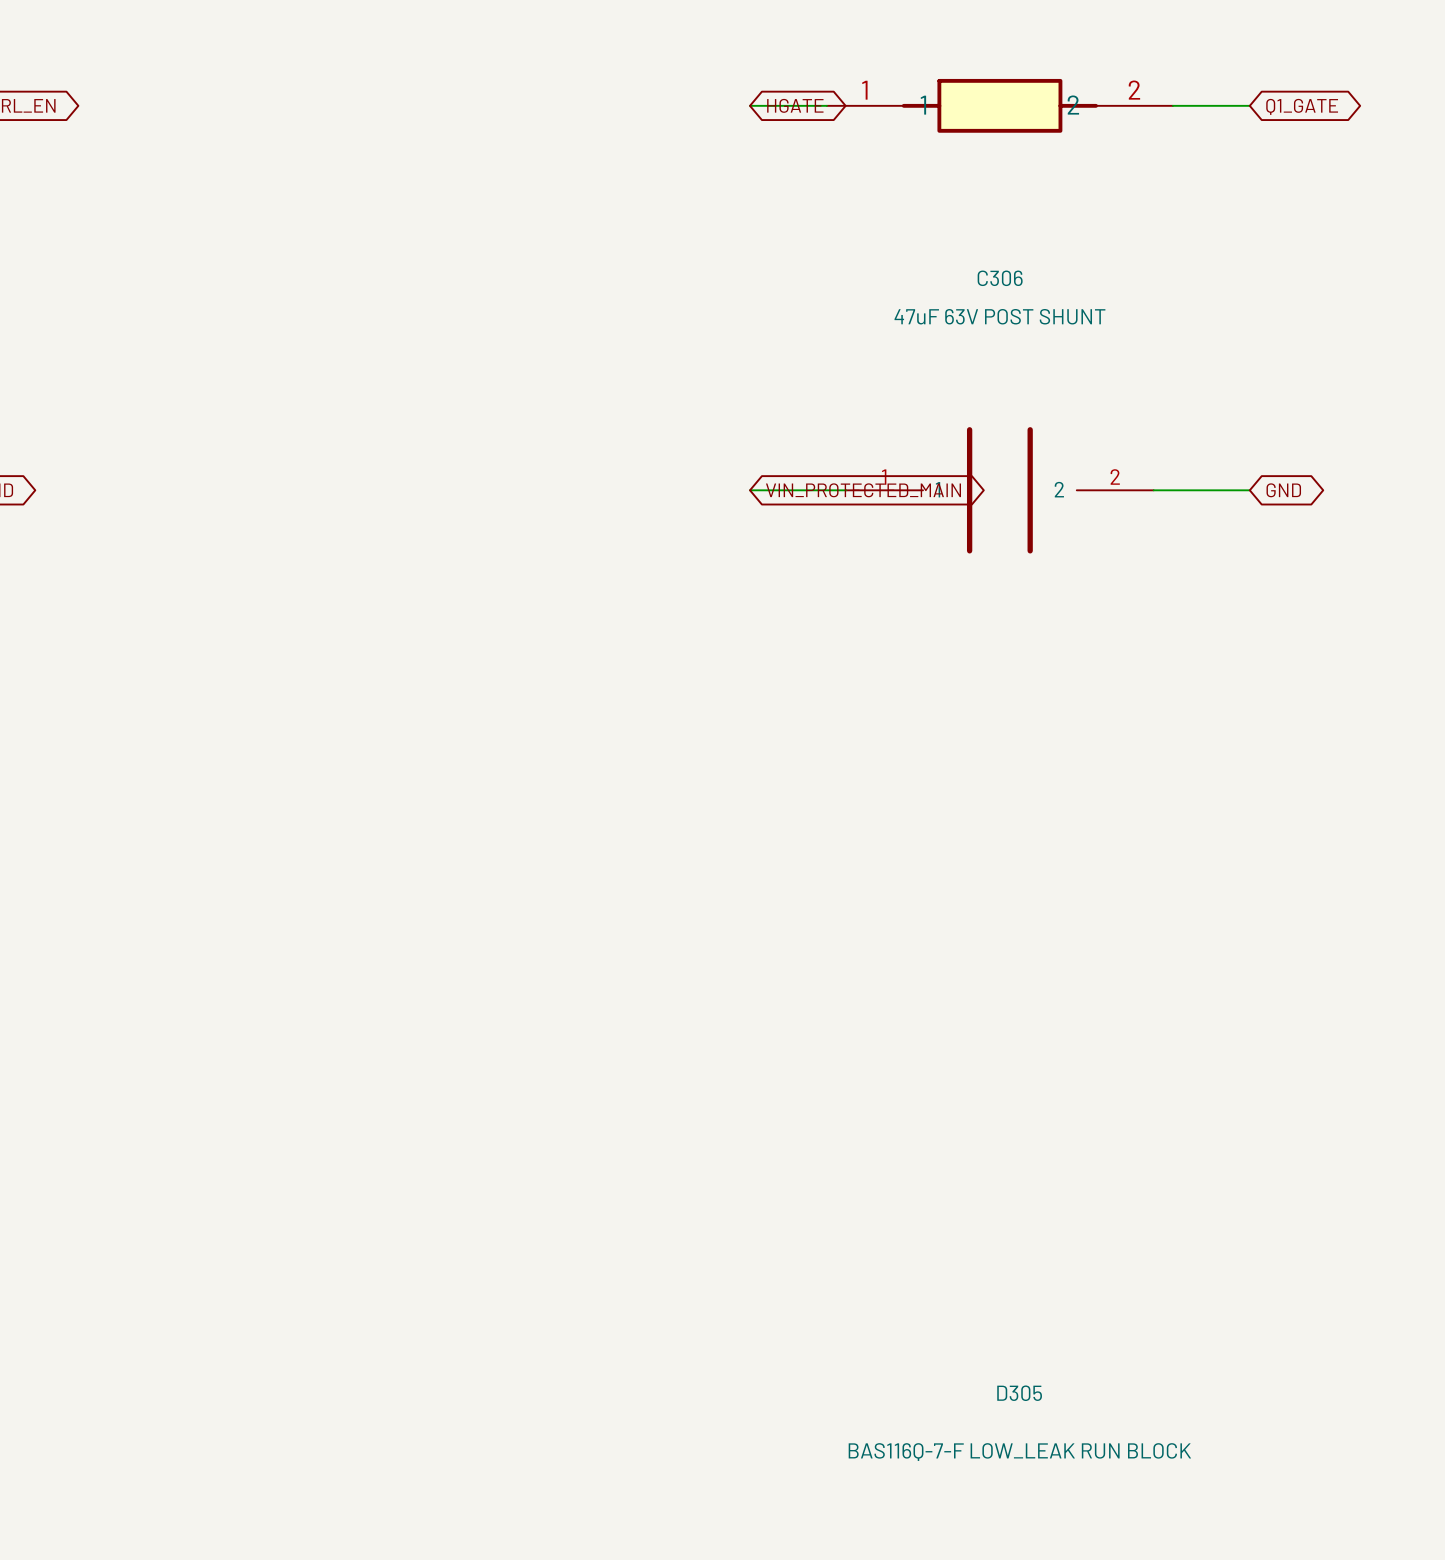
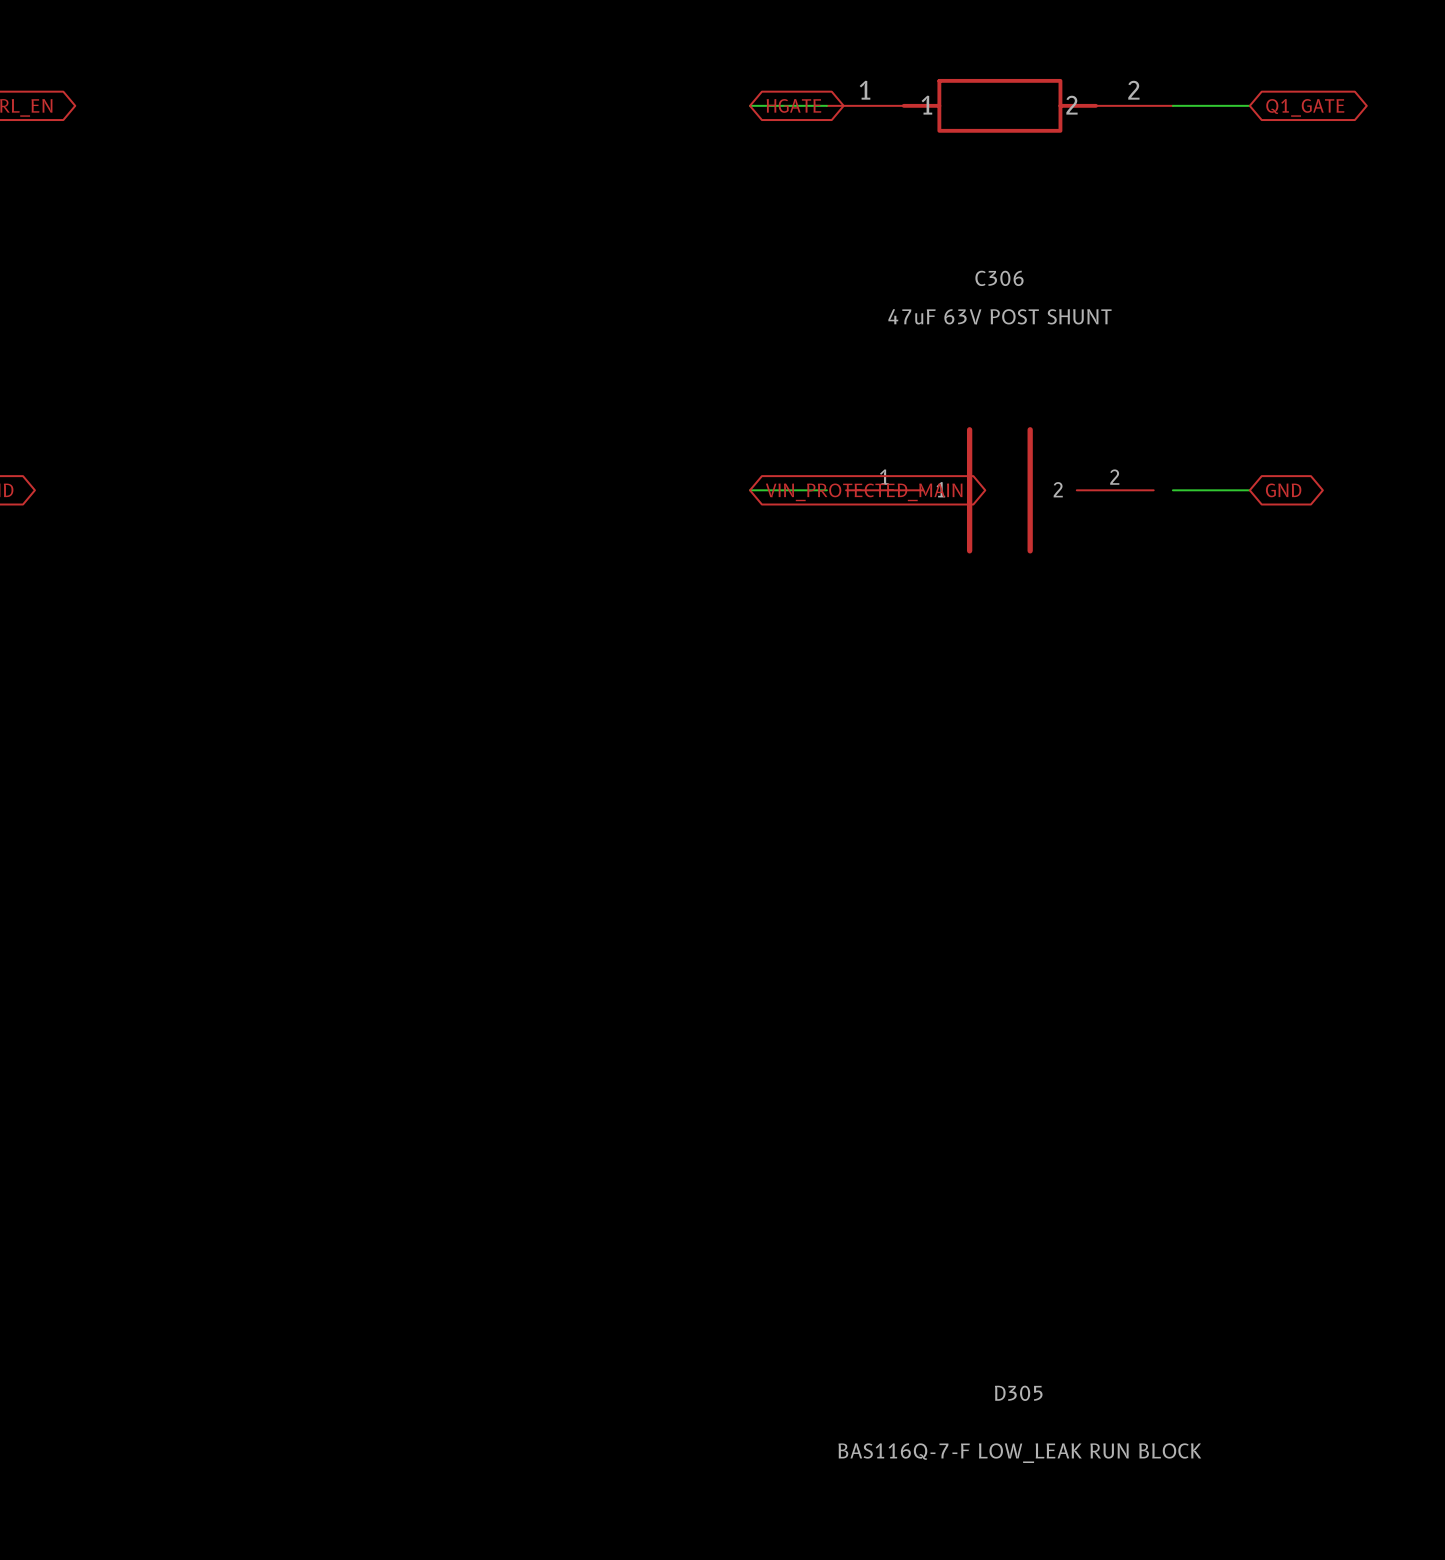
wire: (826, 490) (846, 490) -> none
wire: (1153, 490) (1172, 490) -> none

